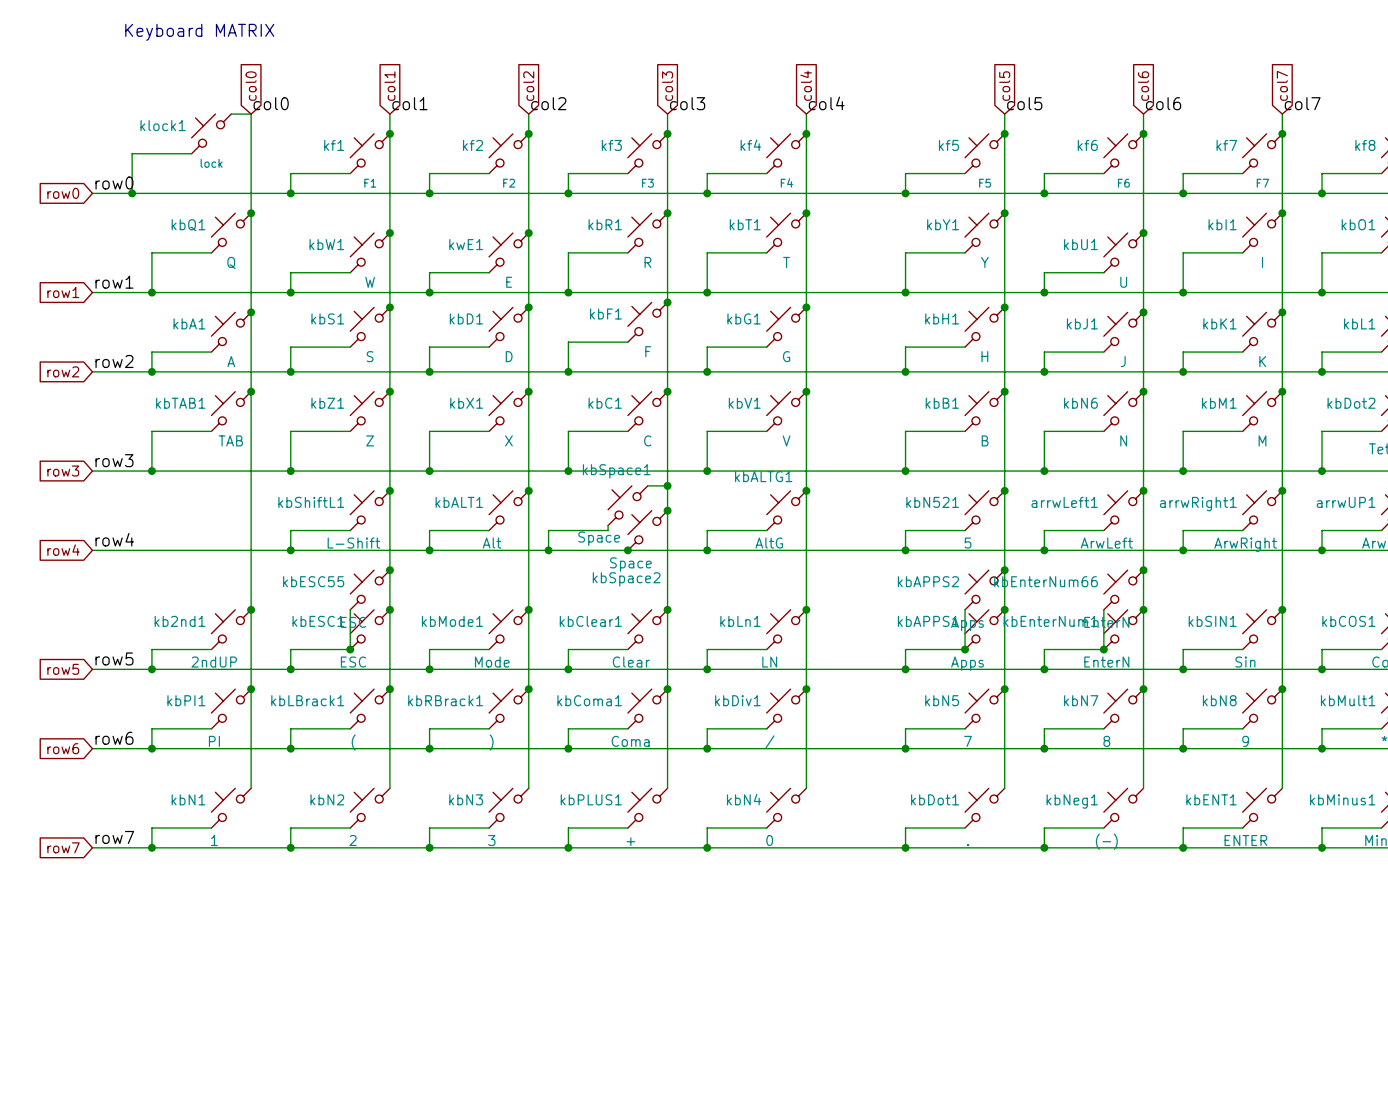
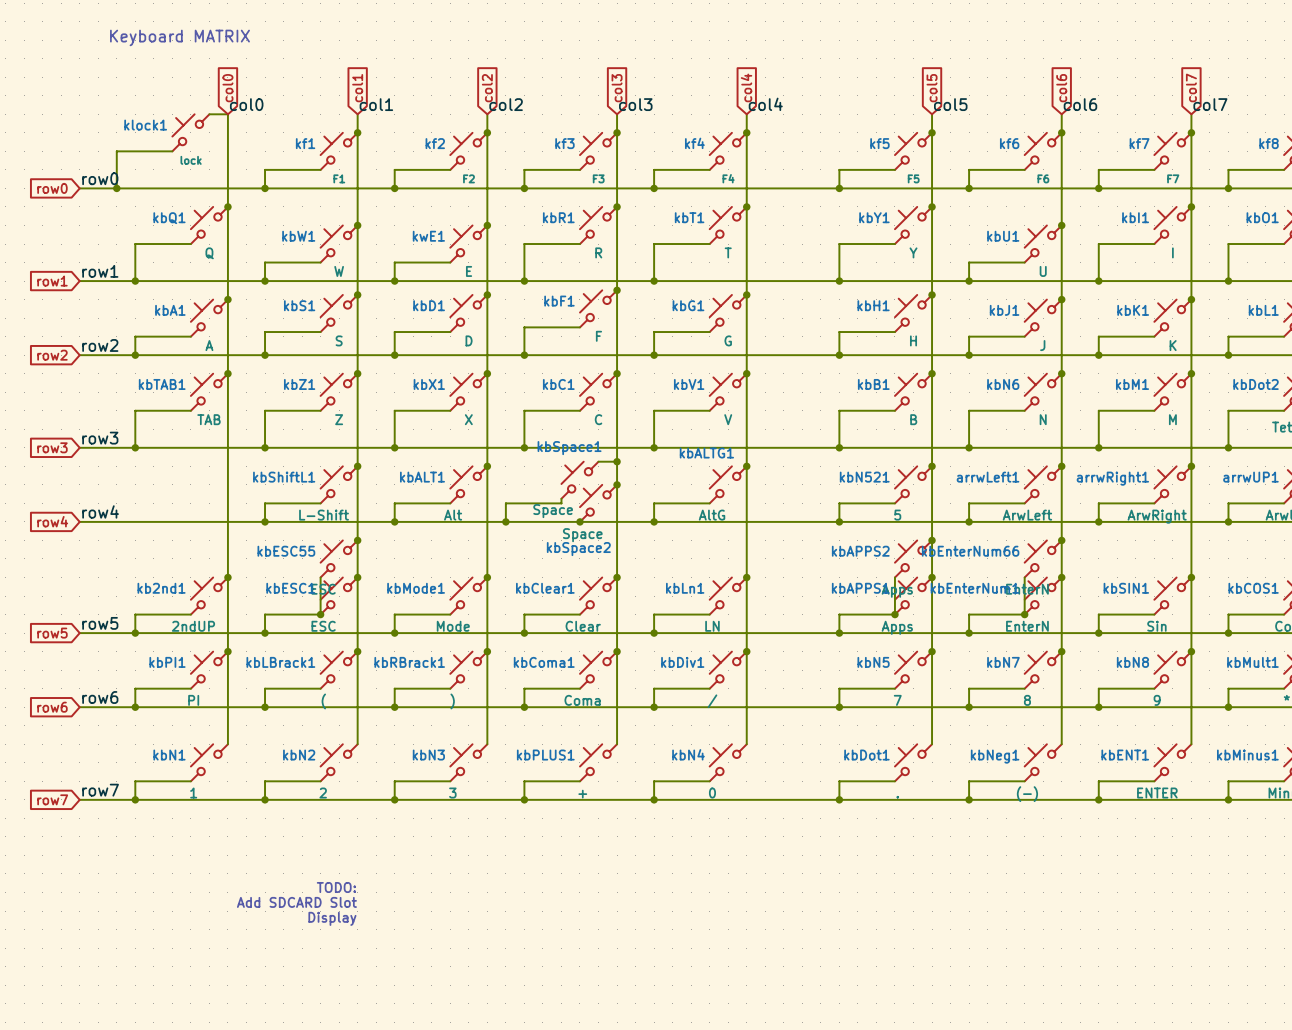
text: none -> TODO: (336, 887)
text: none -> Add SDCARD Slot (296, 902)
text: none -> Display (332, 918)

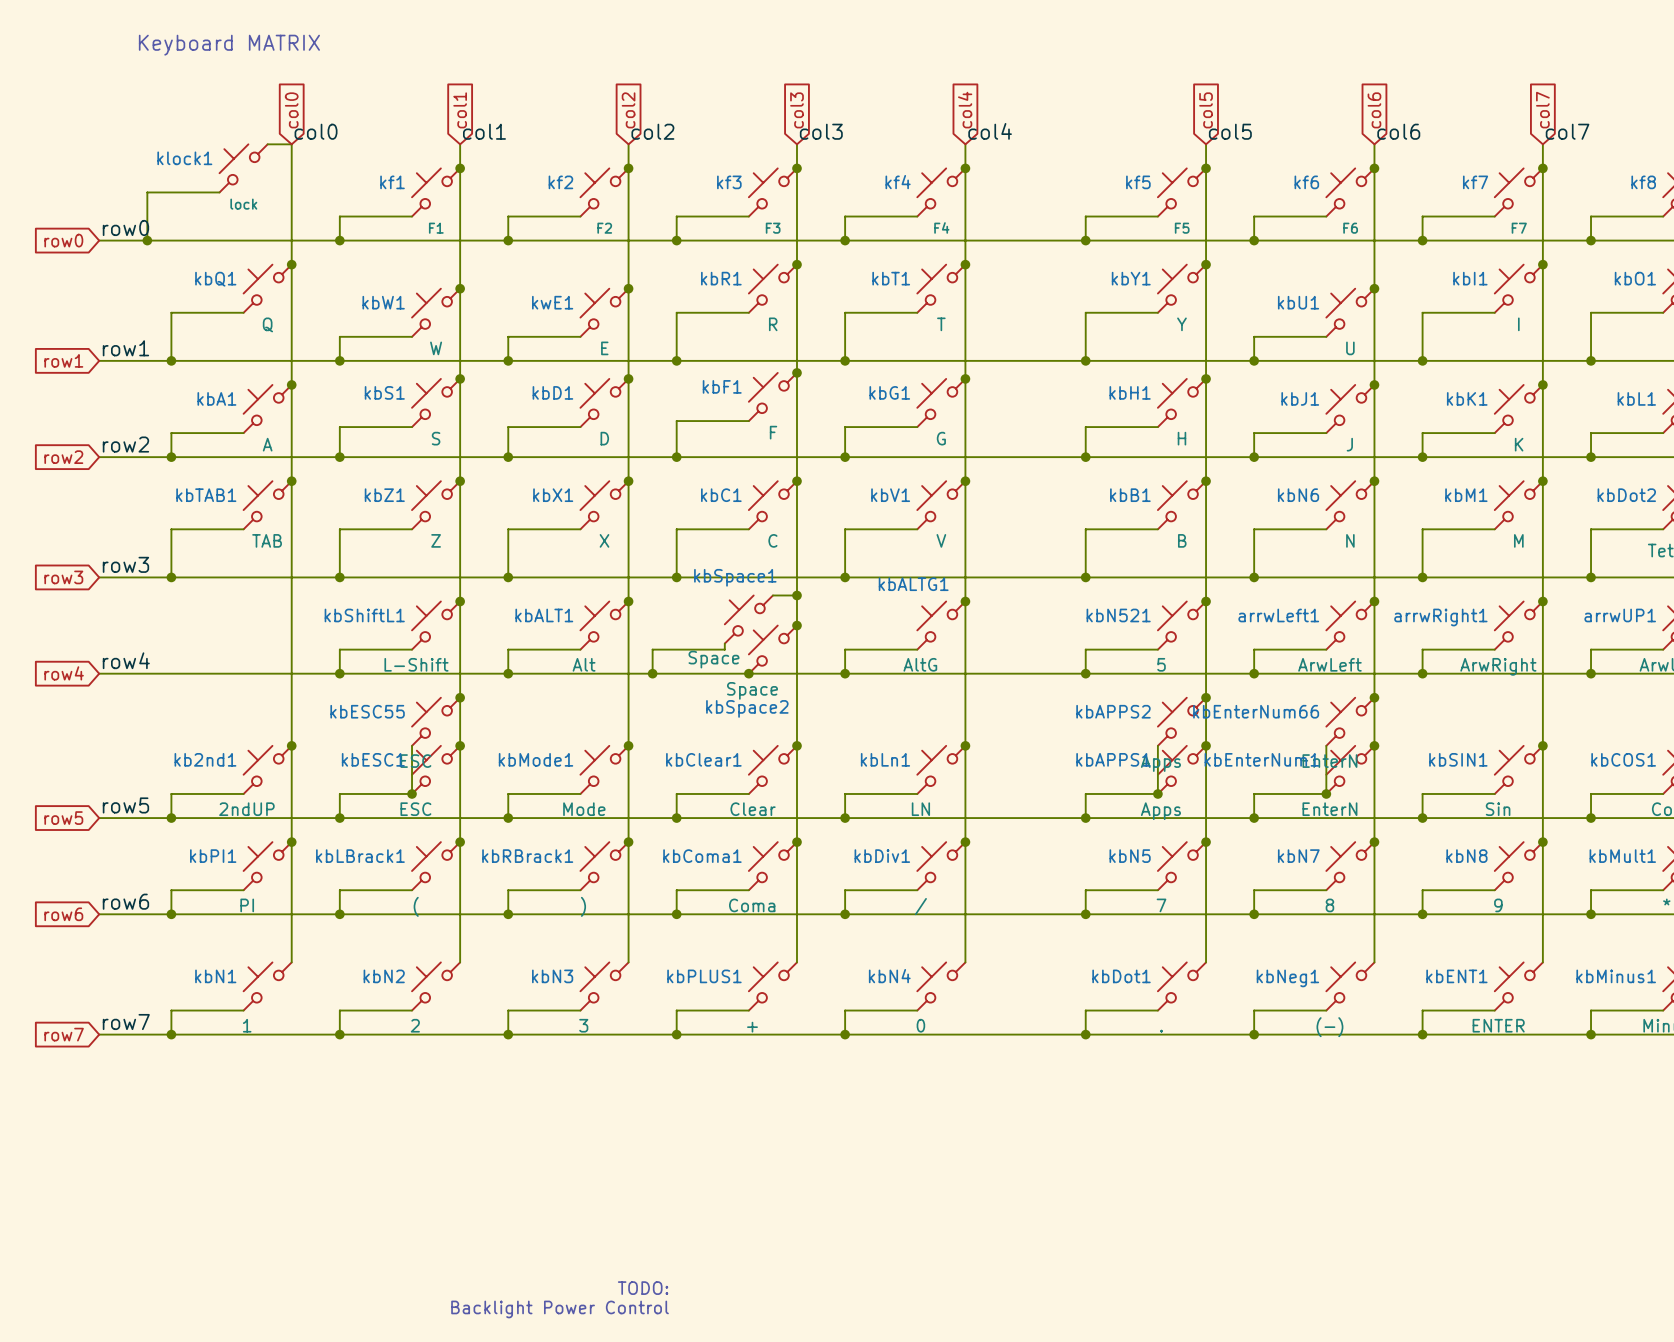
text: TODO: (336, 887) -> none
text: Add SDCARD Slot (296, 902) -> none
text: Display (332, 918) -> none
text: none -> TODO: (643, 1288)
text: none -> Backlight Power Control (560, 1309)

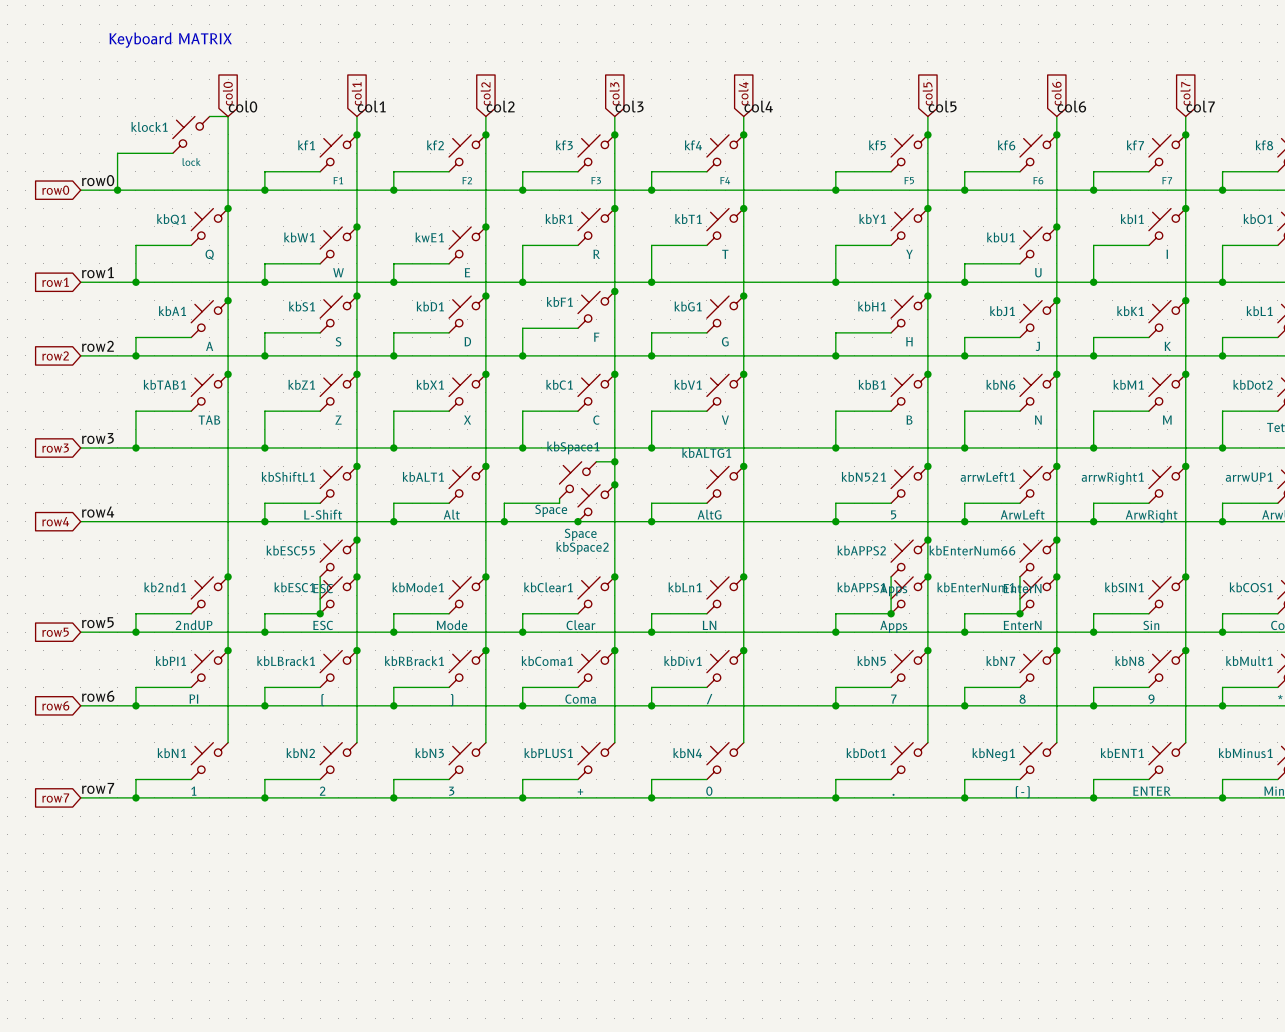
text: TODO: (643, 1288) -> none
text: Backlight Power Control (560, 1309) -> none

